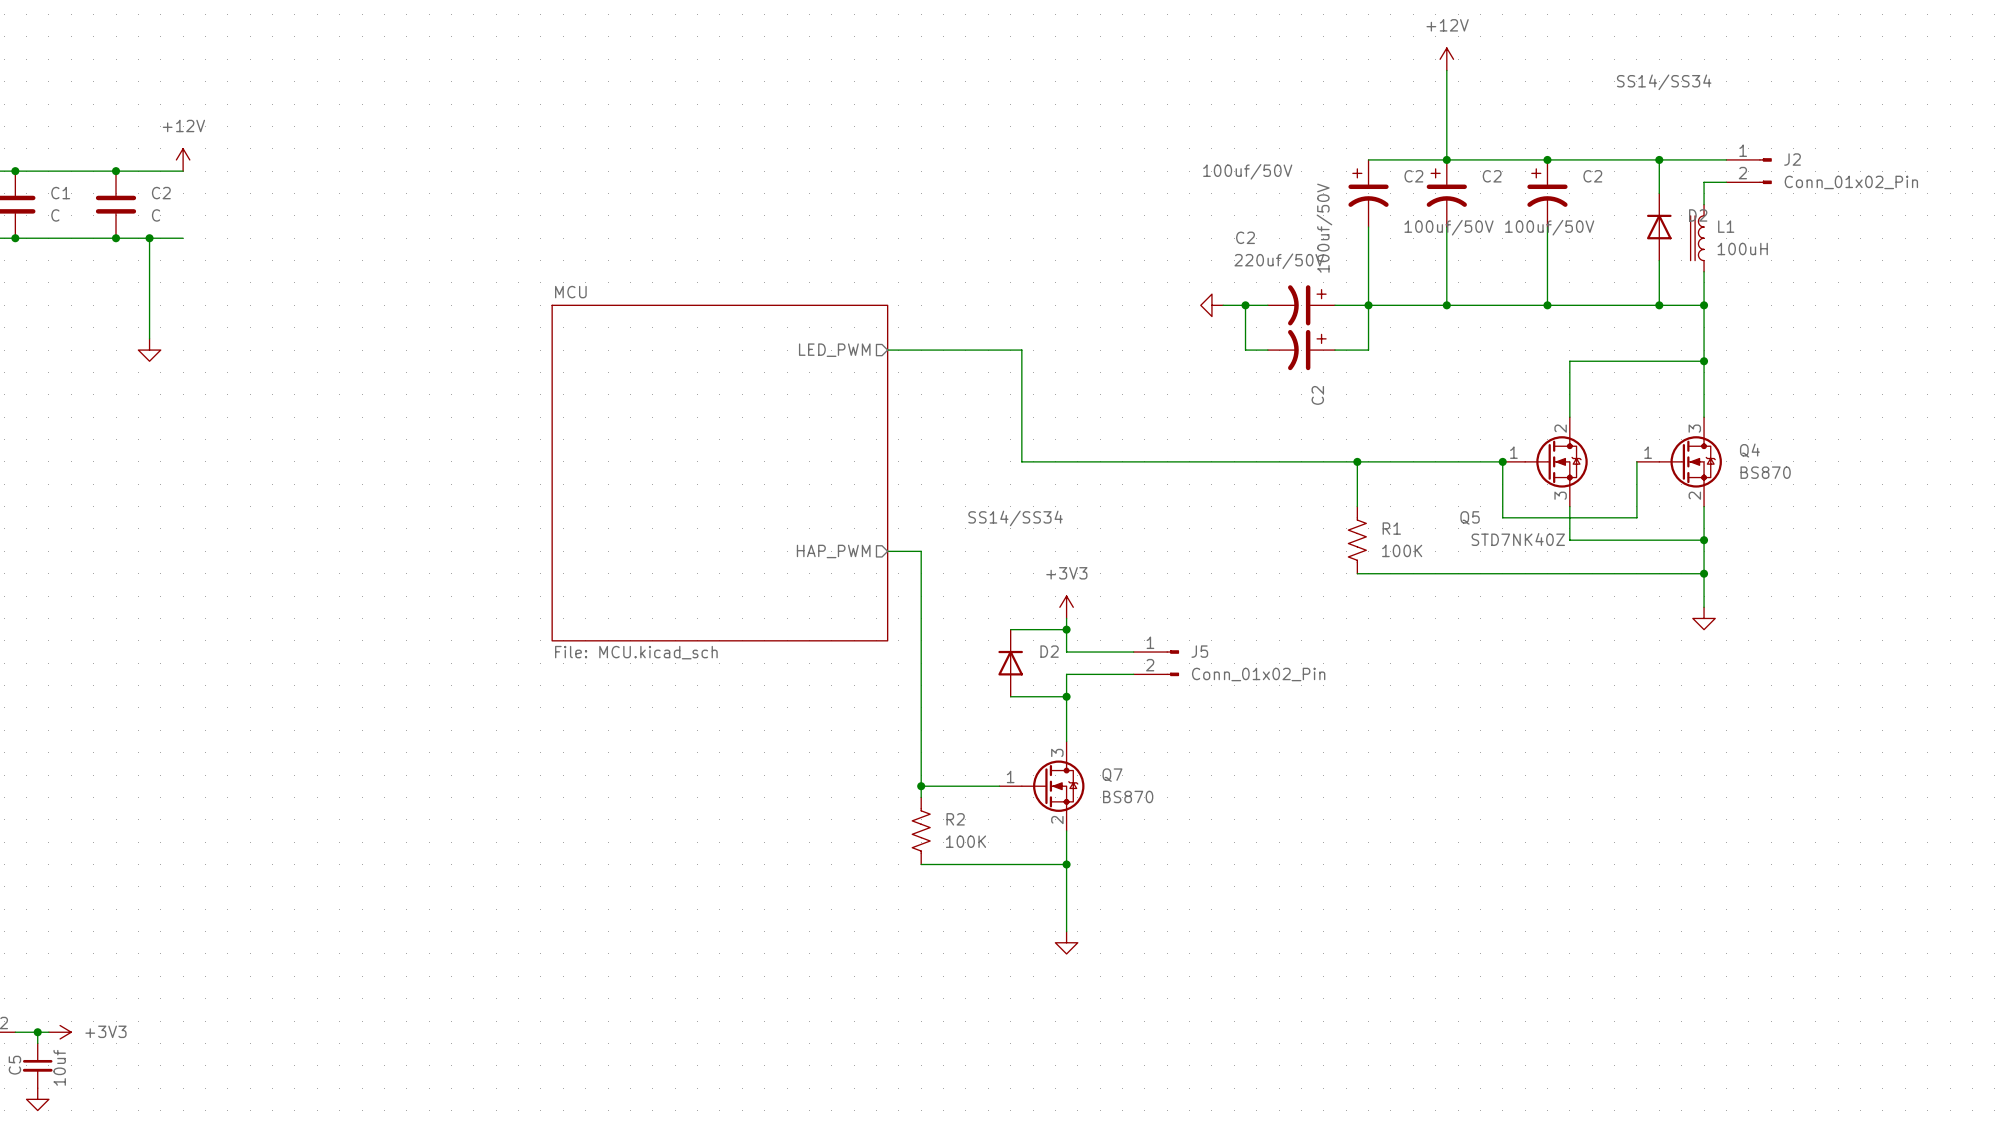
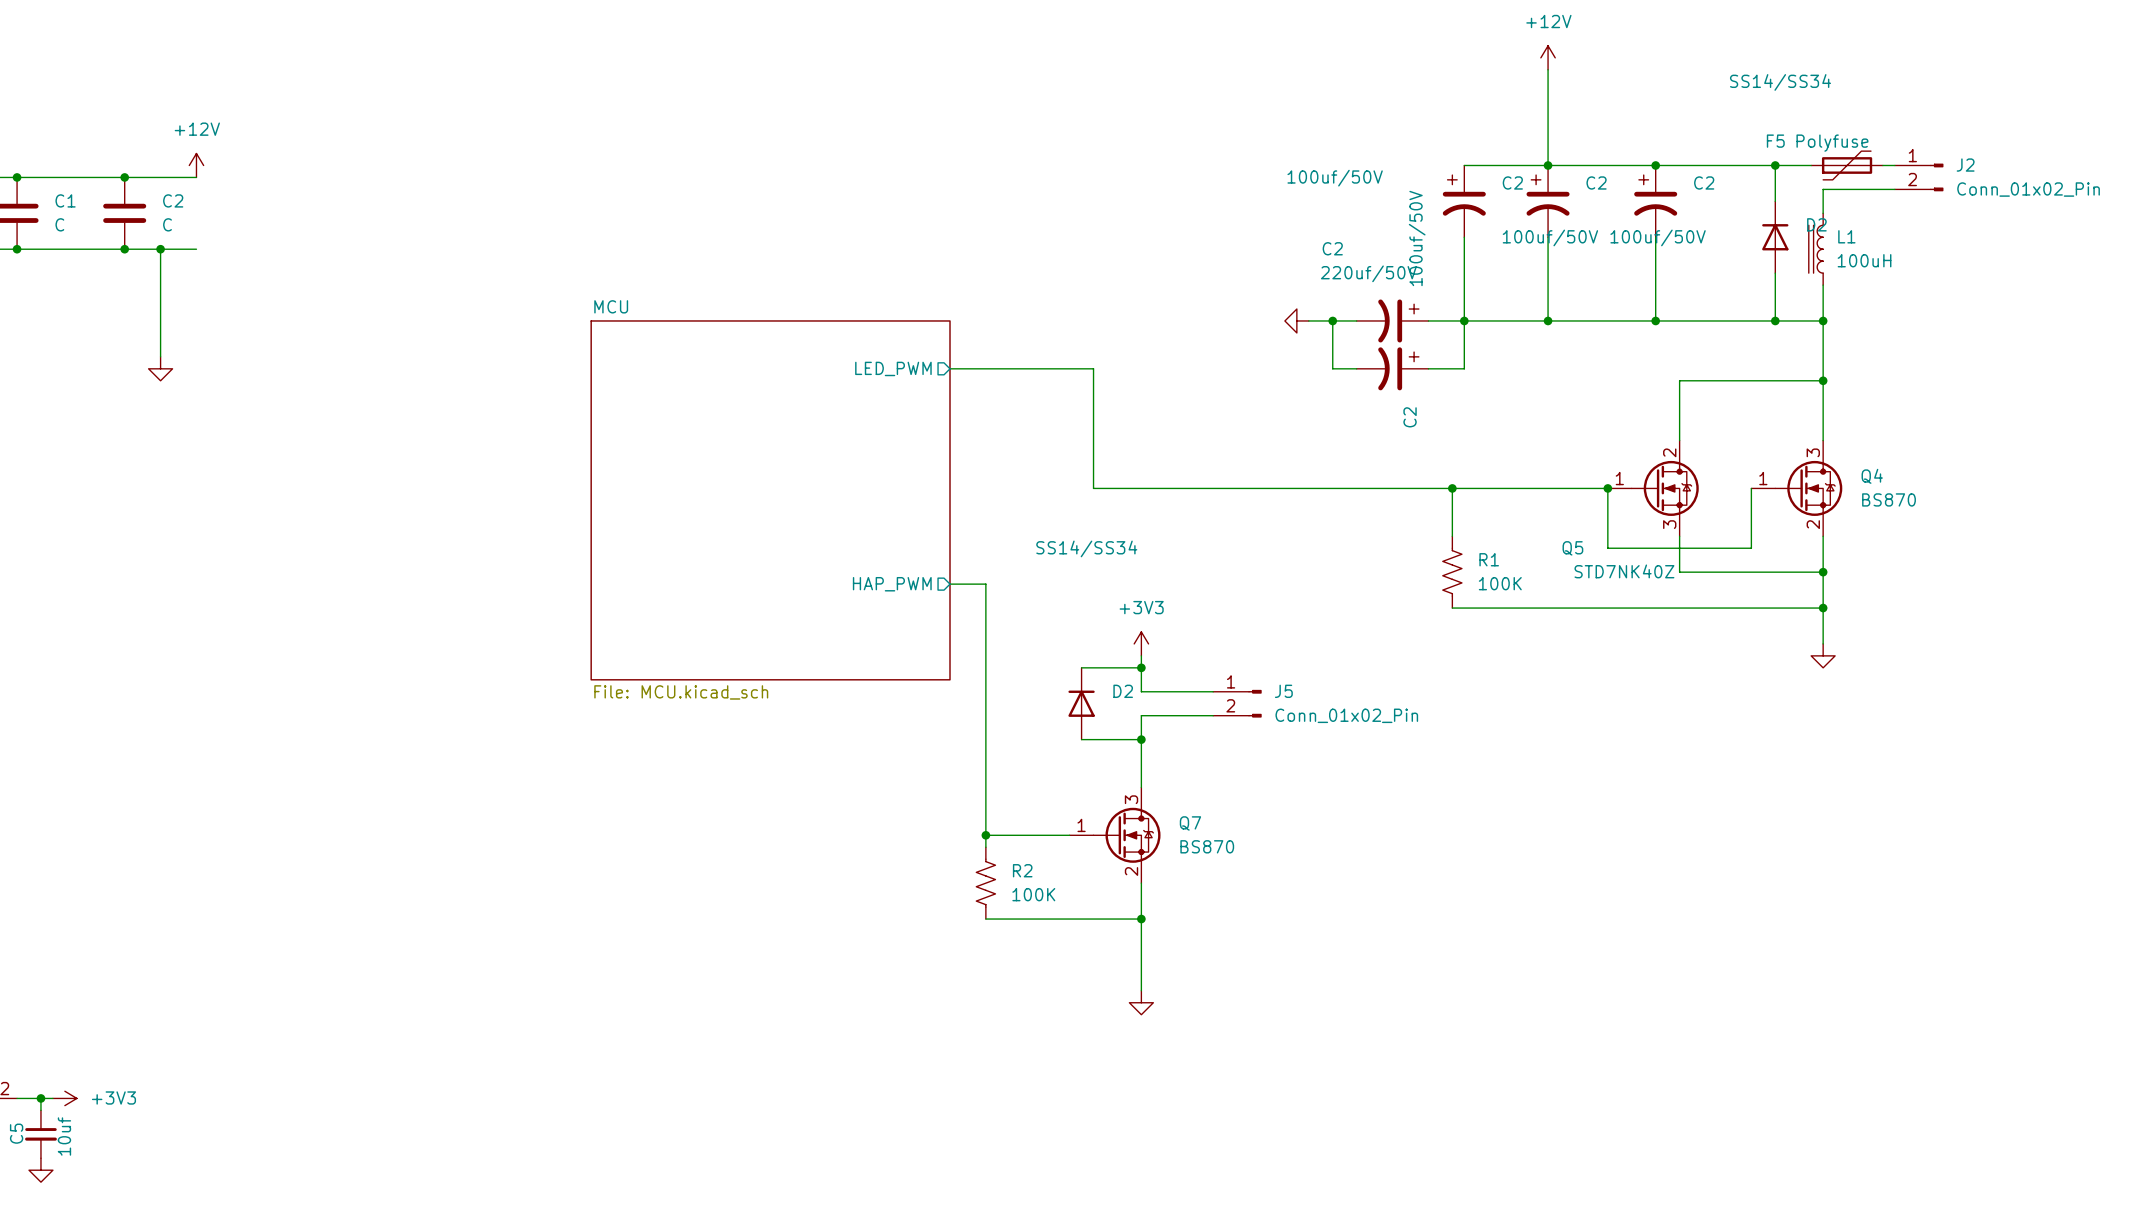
F5: none -> Polyfuse (1847, 165)
J2 position: (1749, 171) -> (1919, 177)

